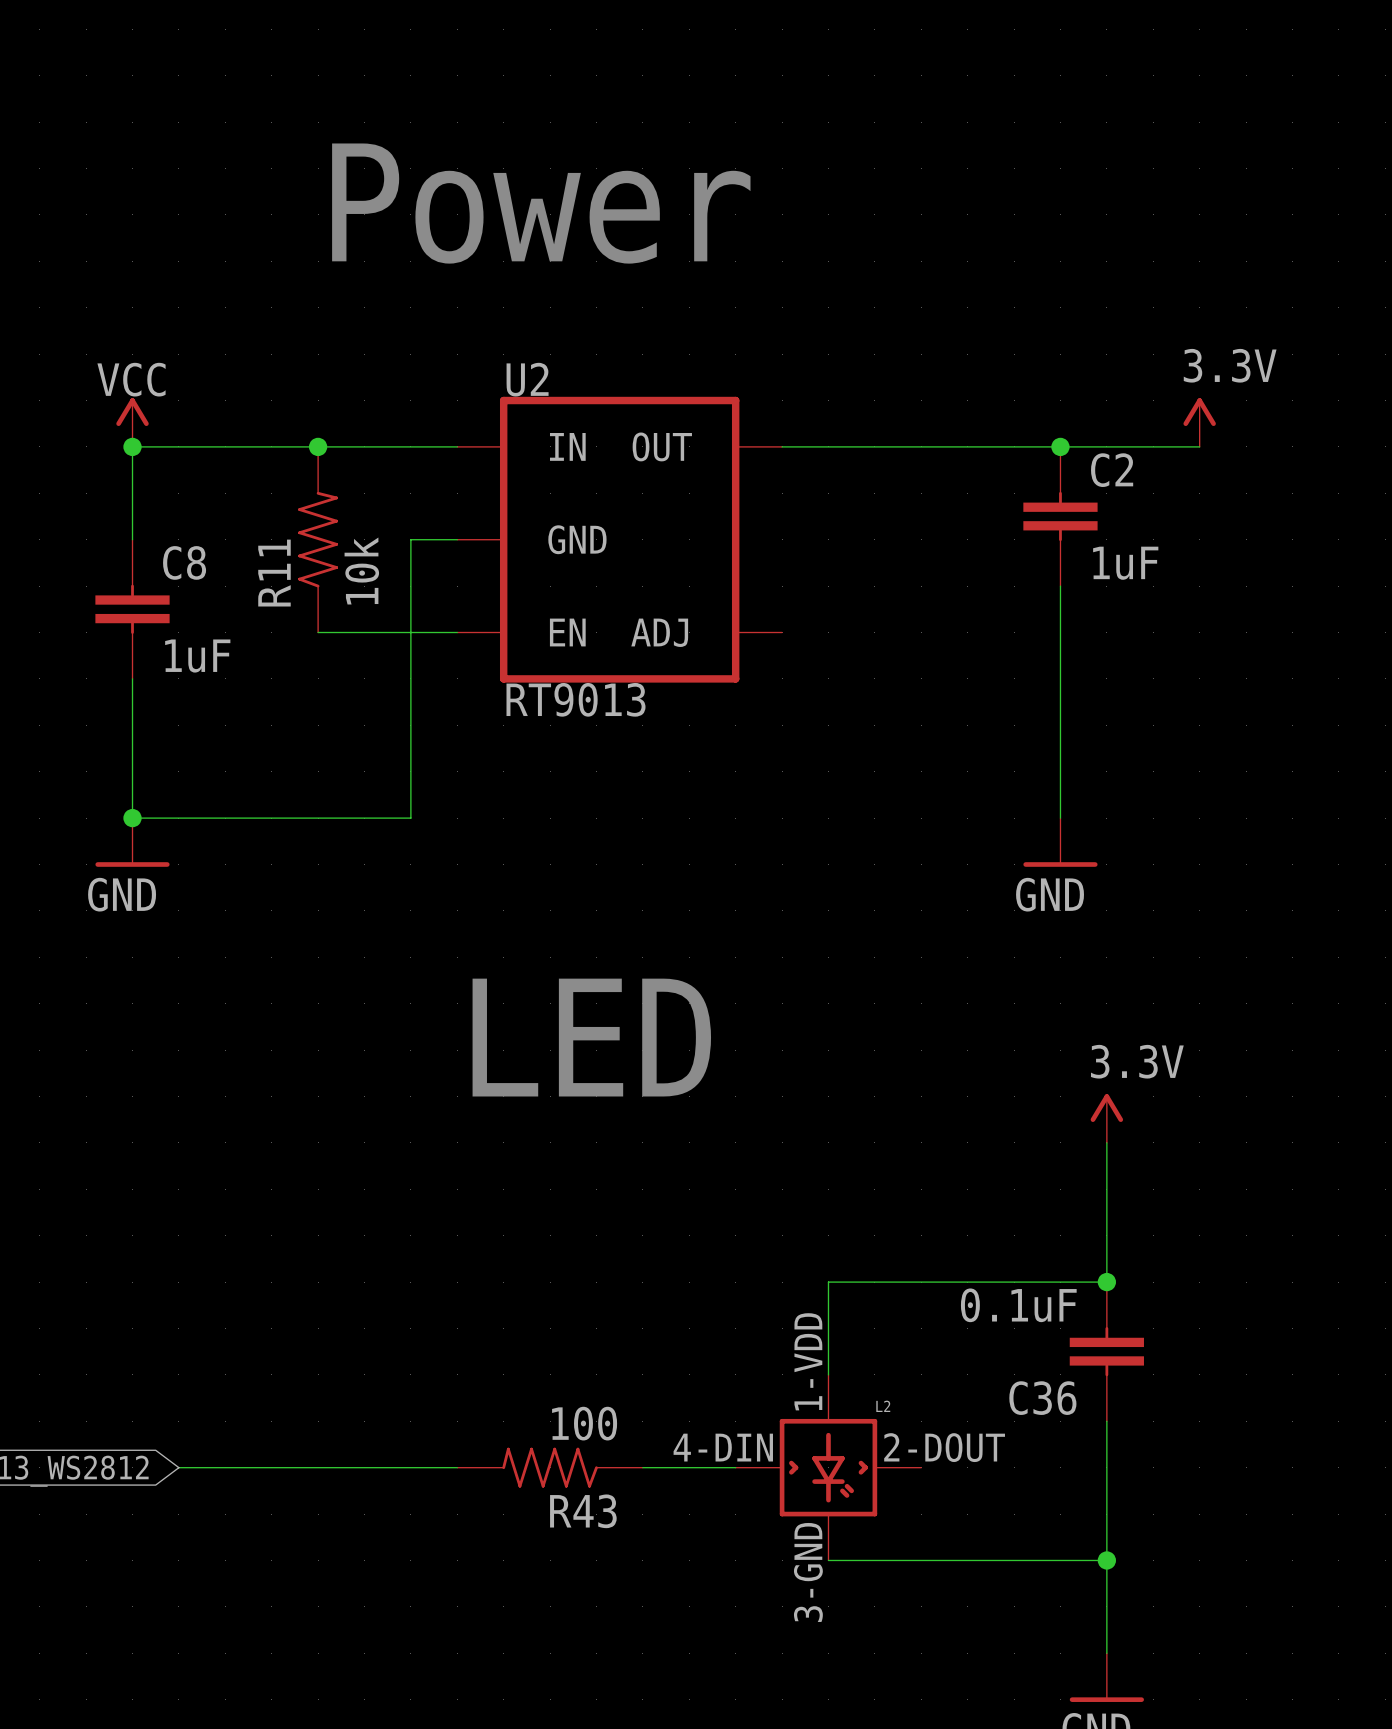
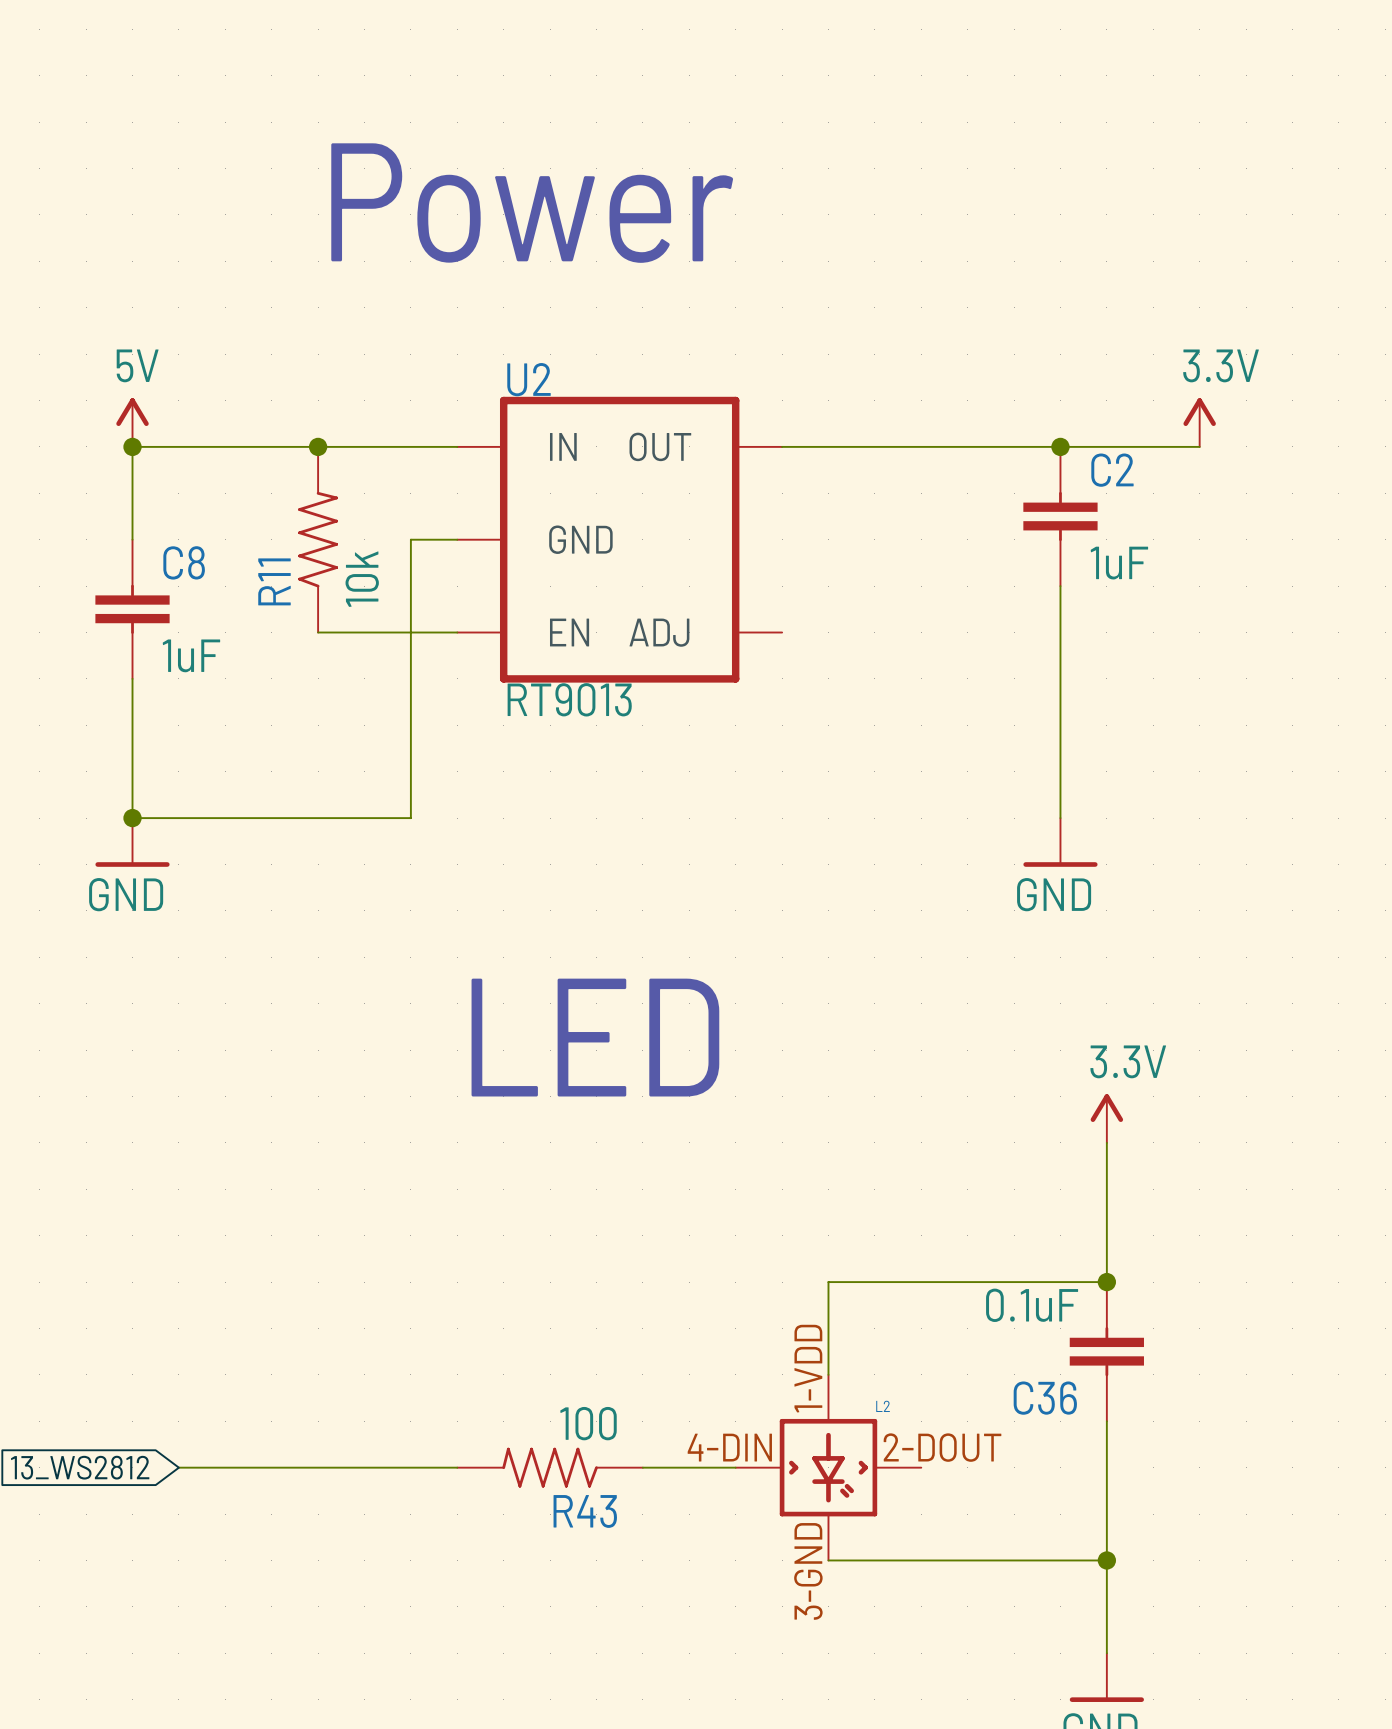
power symbol: VCC (132, 422) -> 5V (132, 422)

